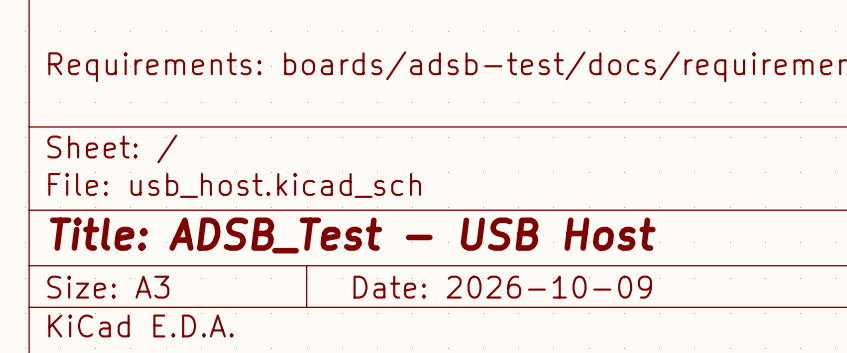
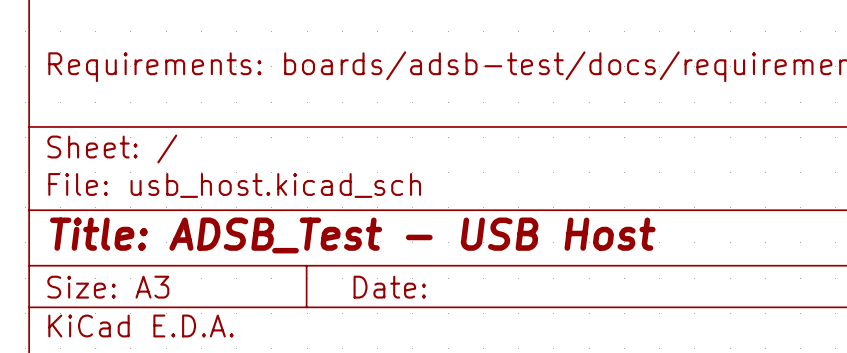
title block: Date: 2026-10-09 (502, 287) -> Date: (389, 287)

